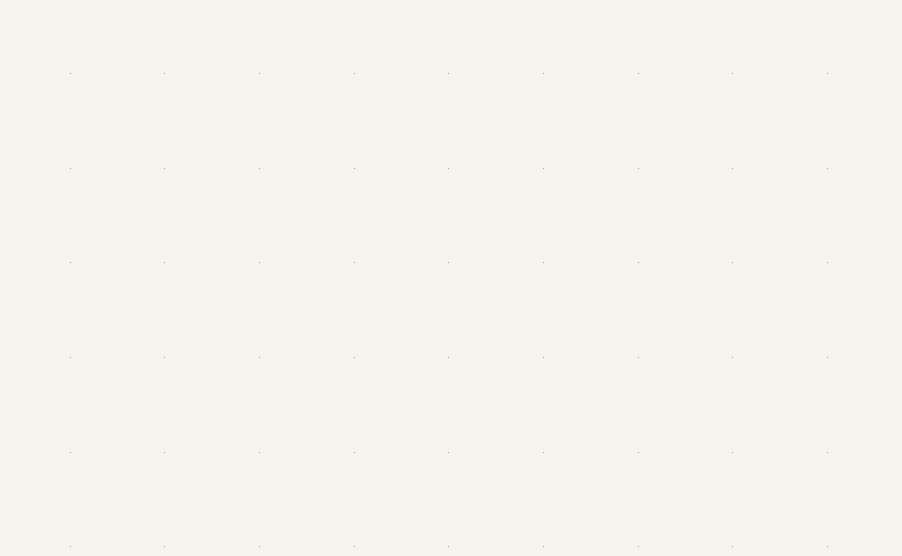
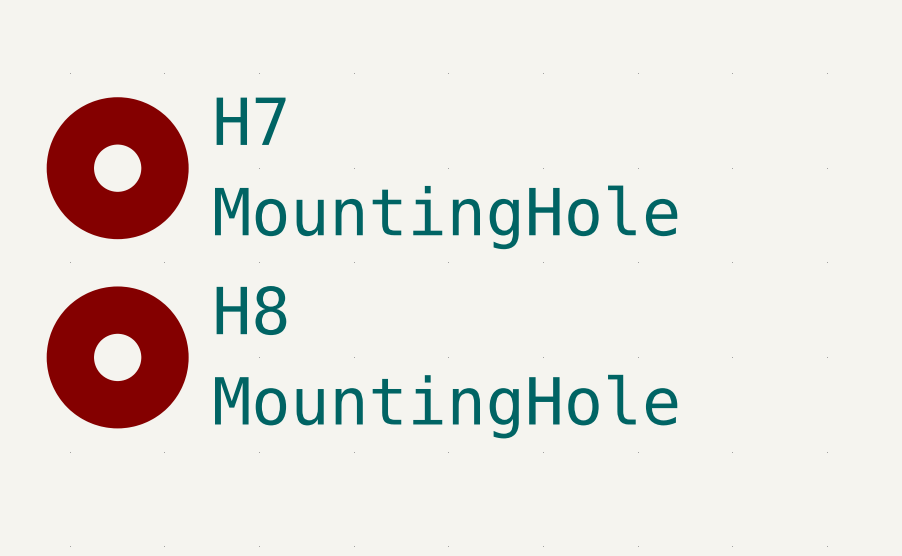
H7: none -> MountingHole (117, 168)
H8: none -> MountingHole (117, 357)

